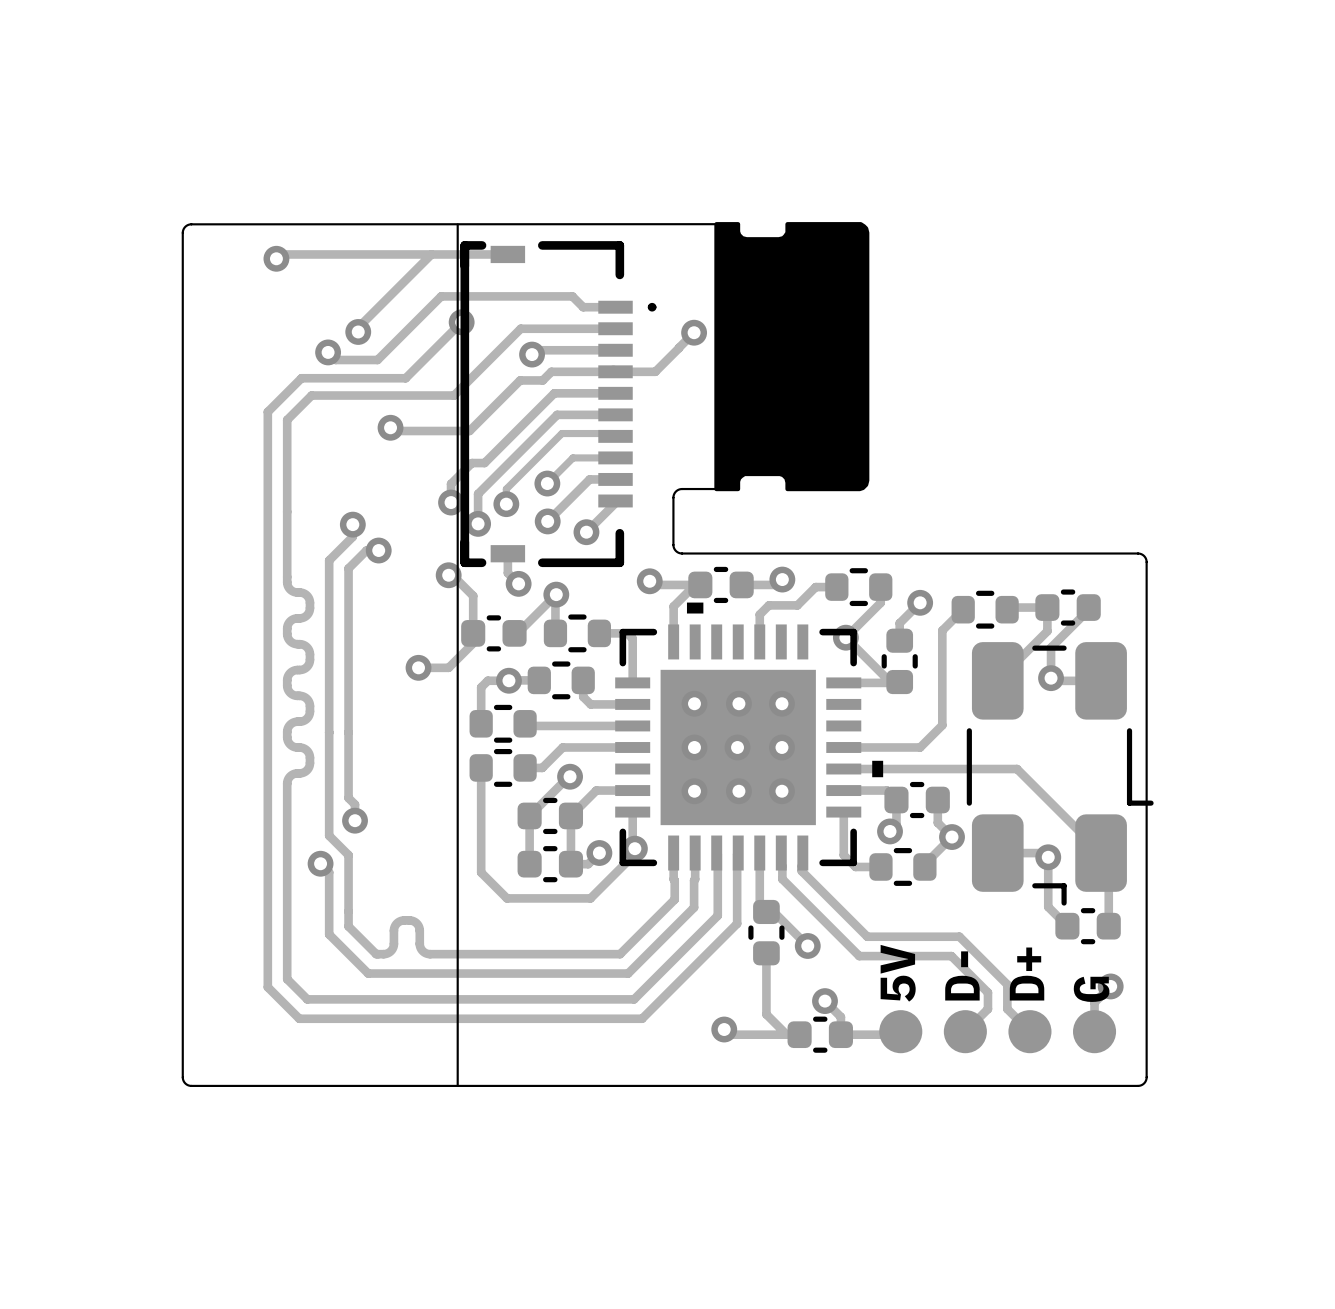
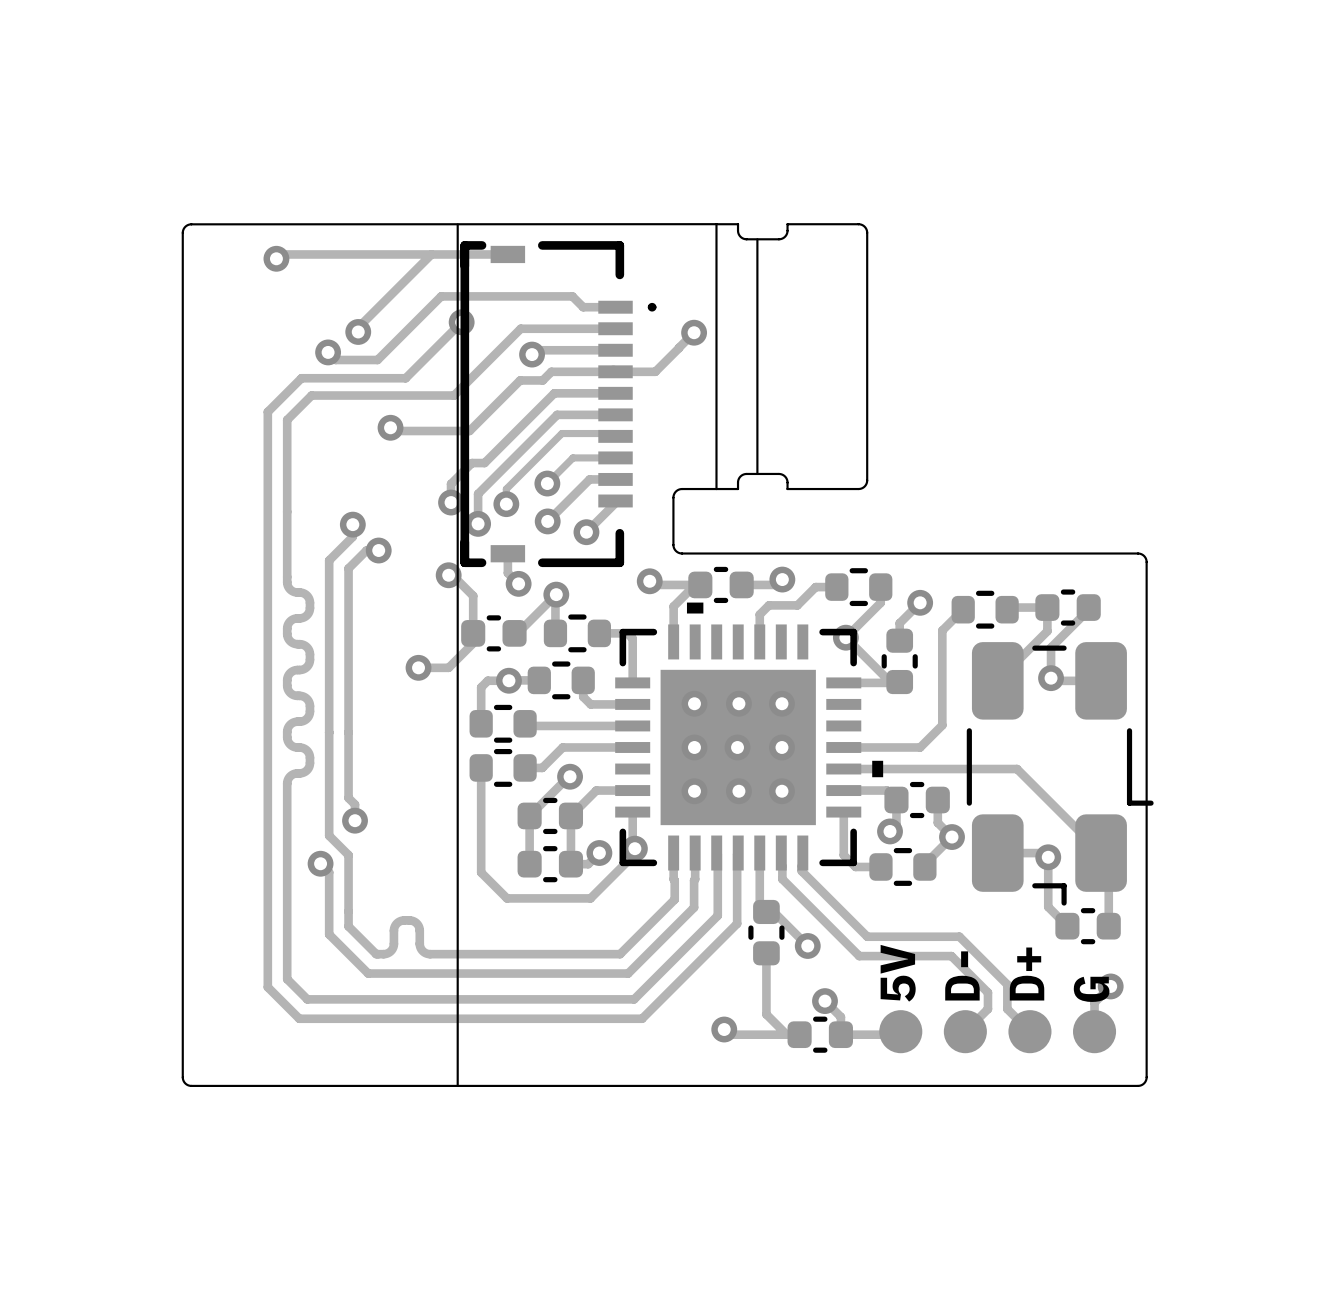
part footprint: [714, 222, 870, 492] -> [715, 223, 869, 491]

